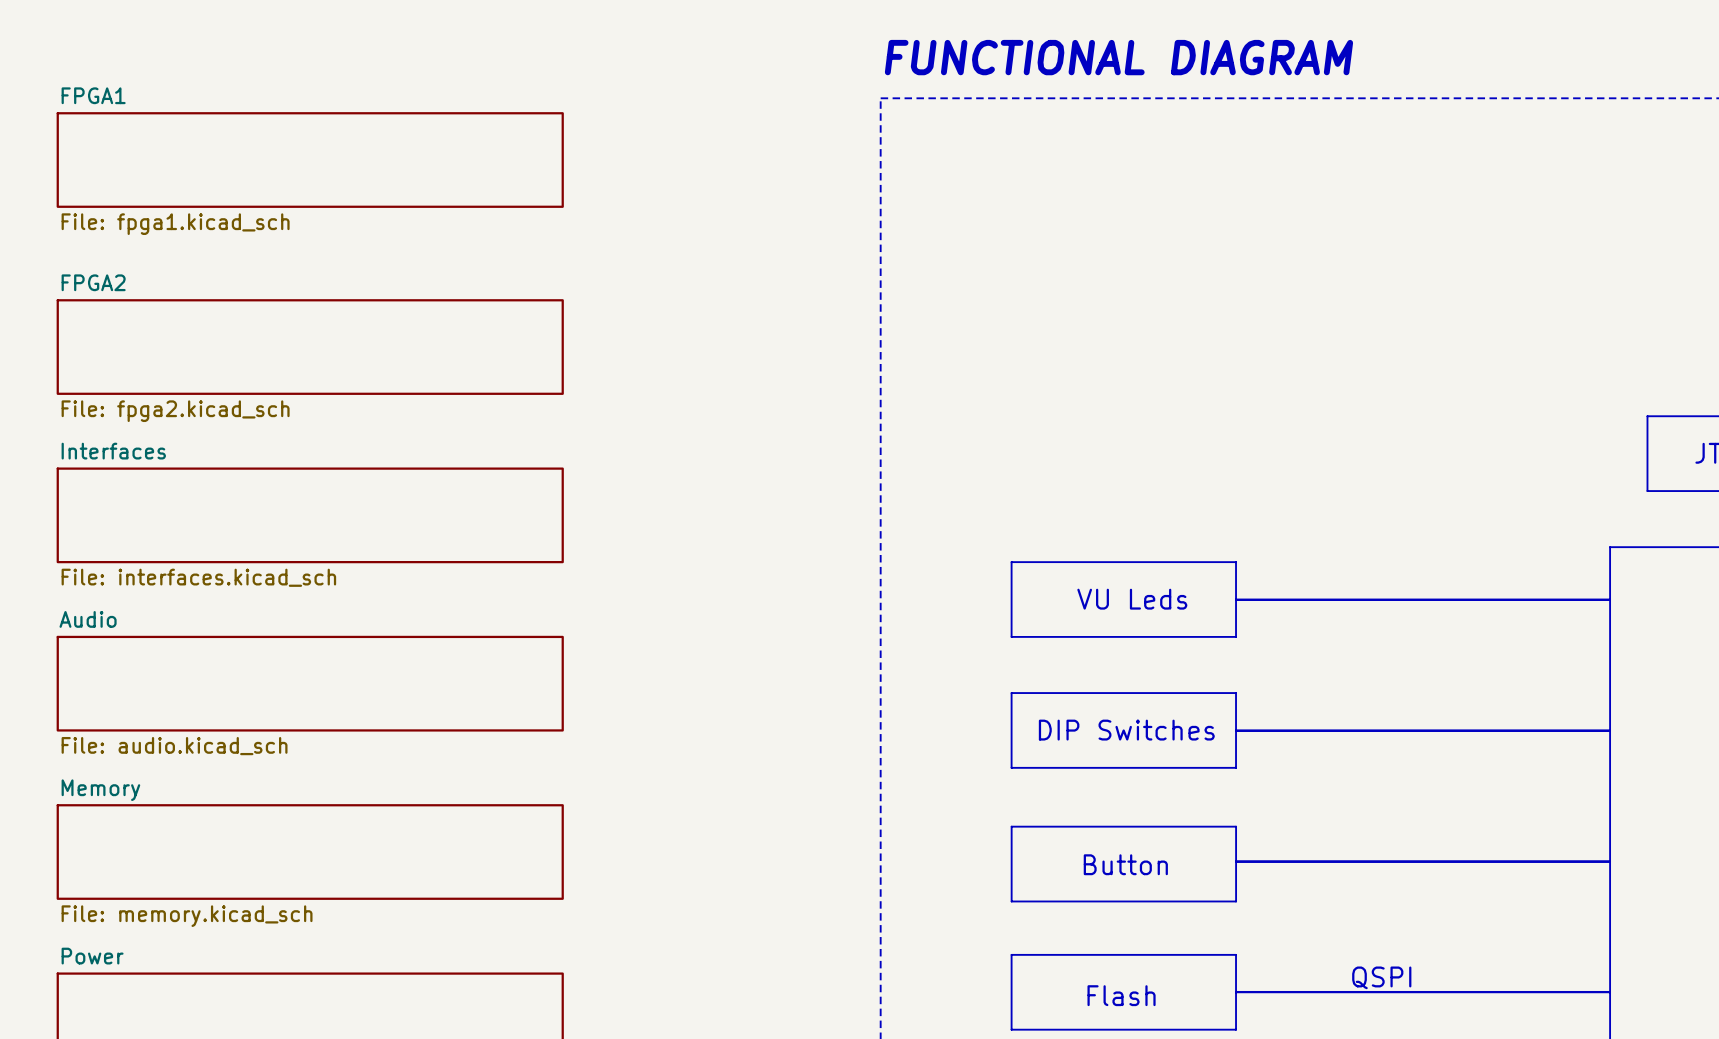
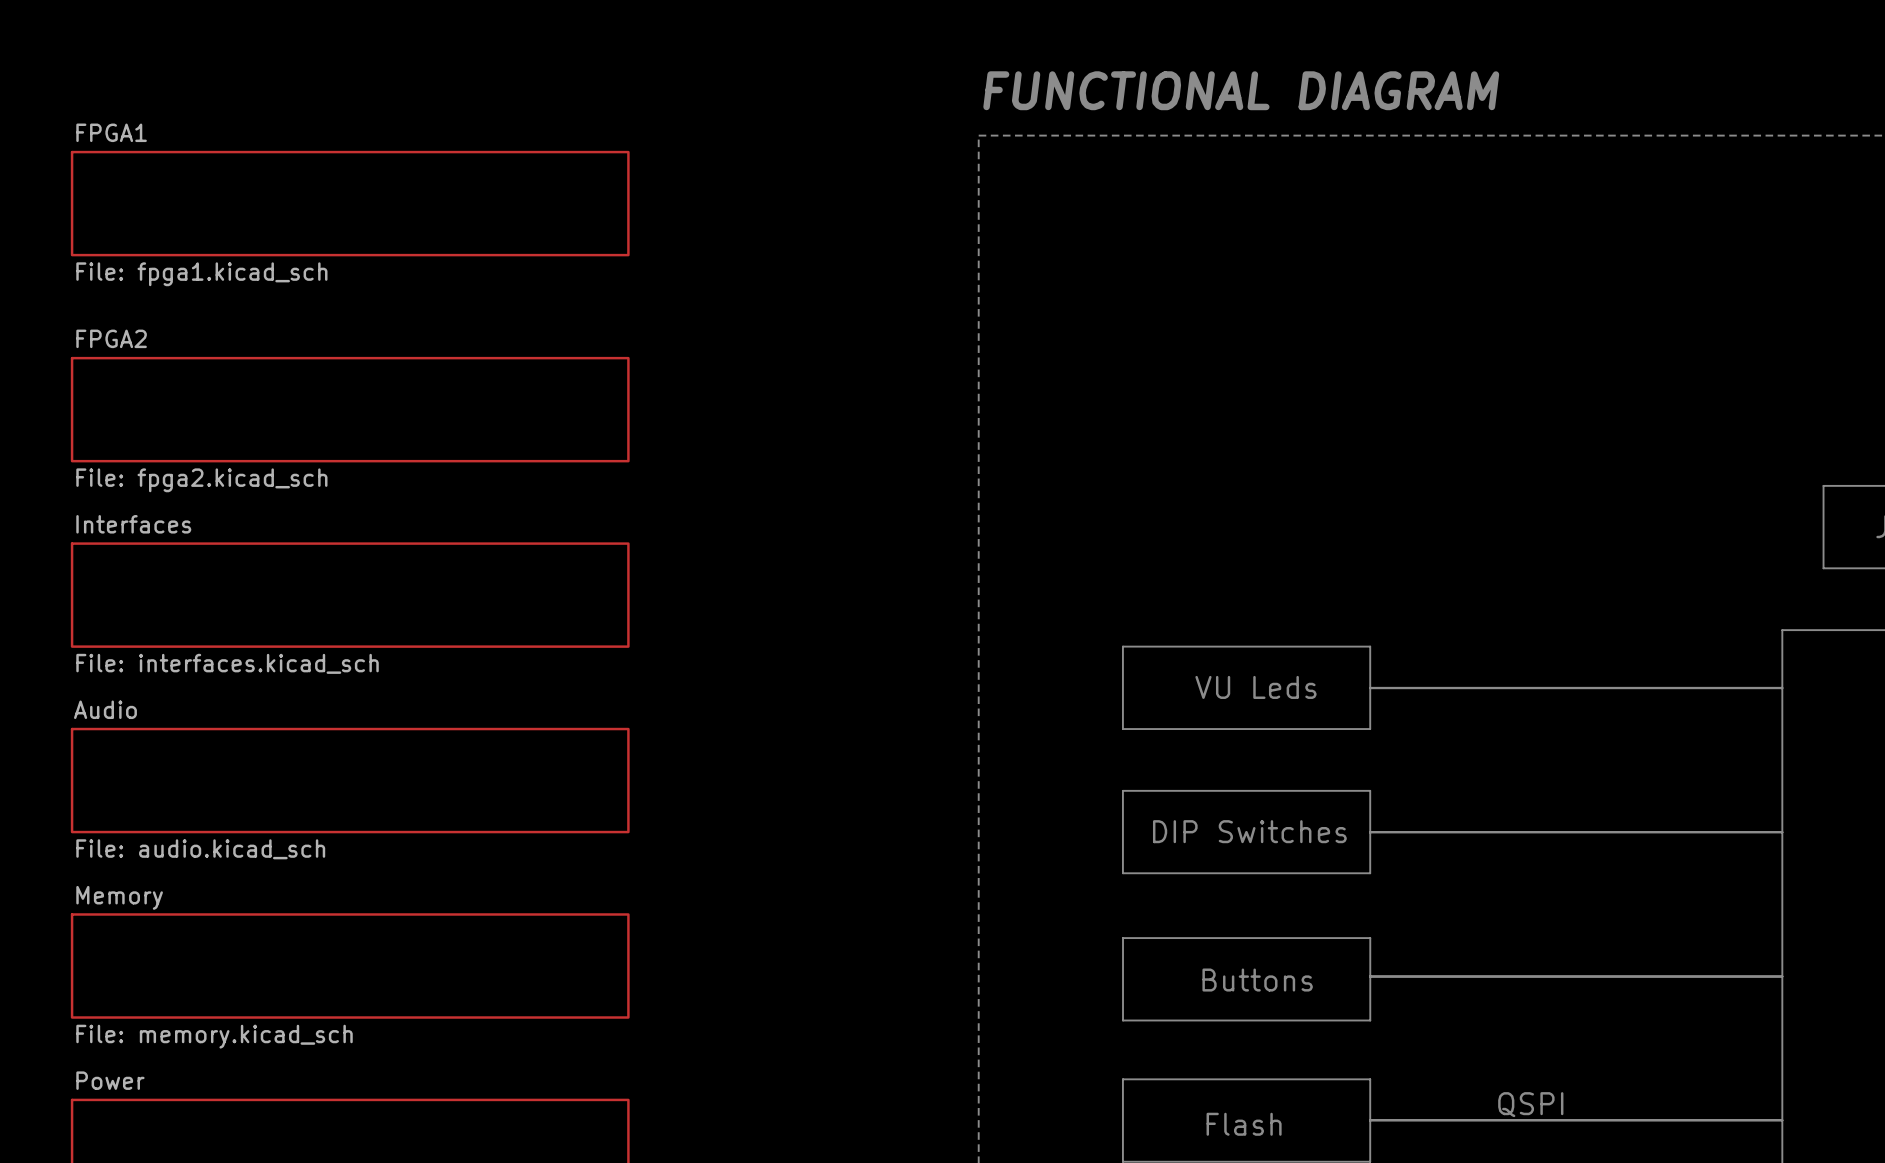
text: Button (1125, 864) -> Buttons (1257, 980)

